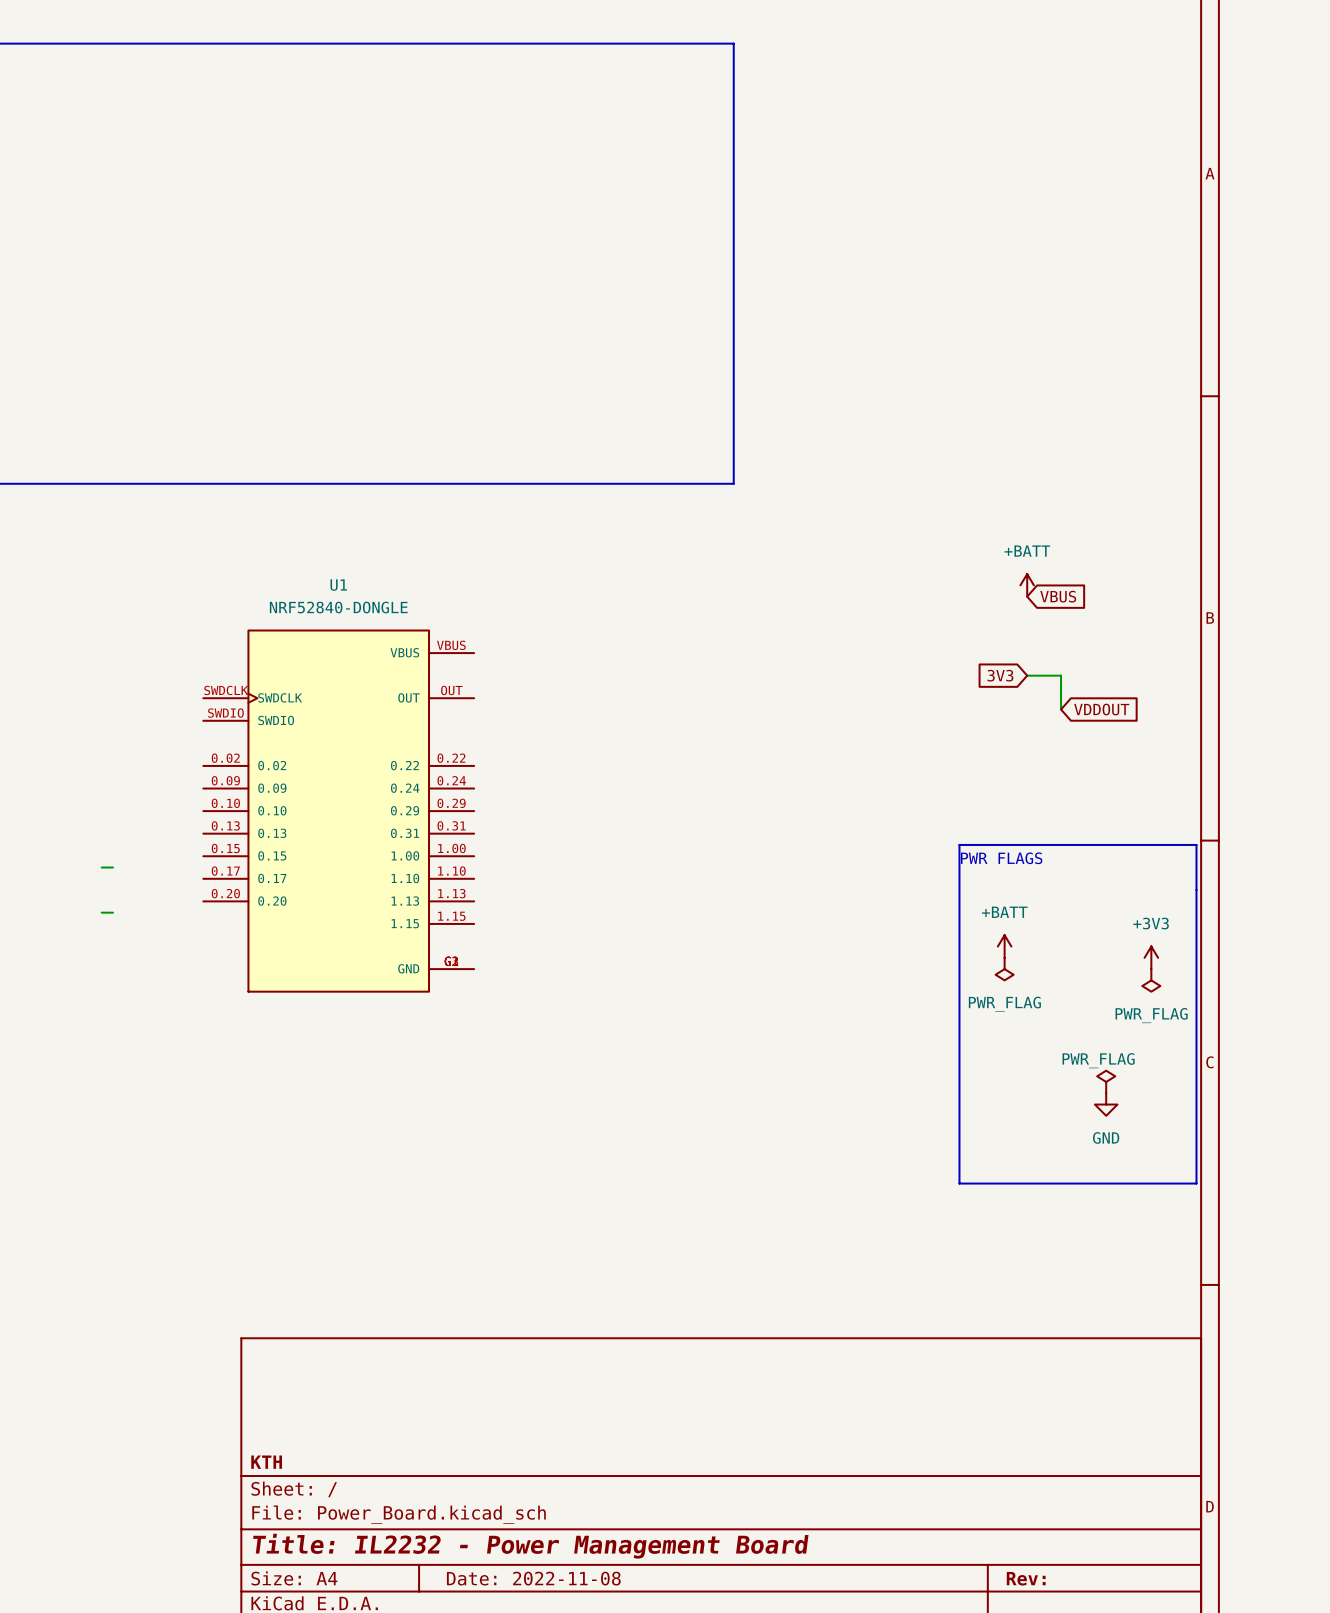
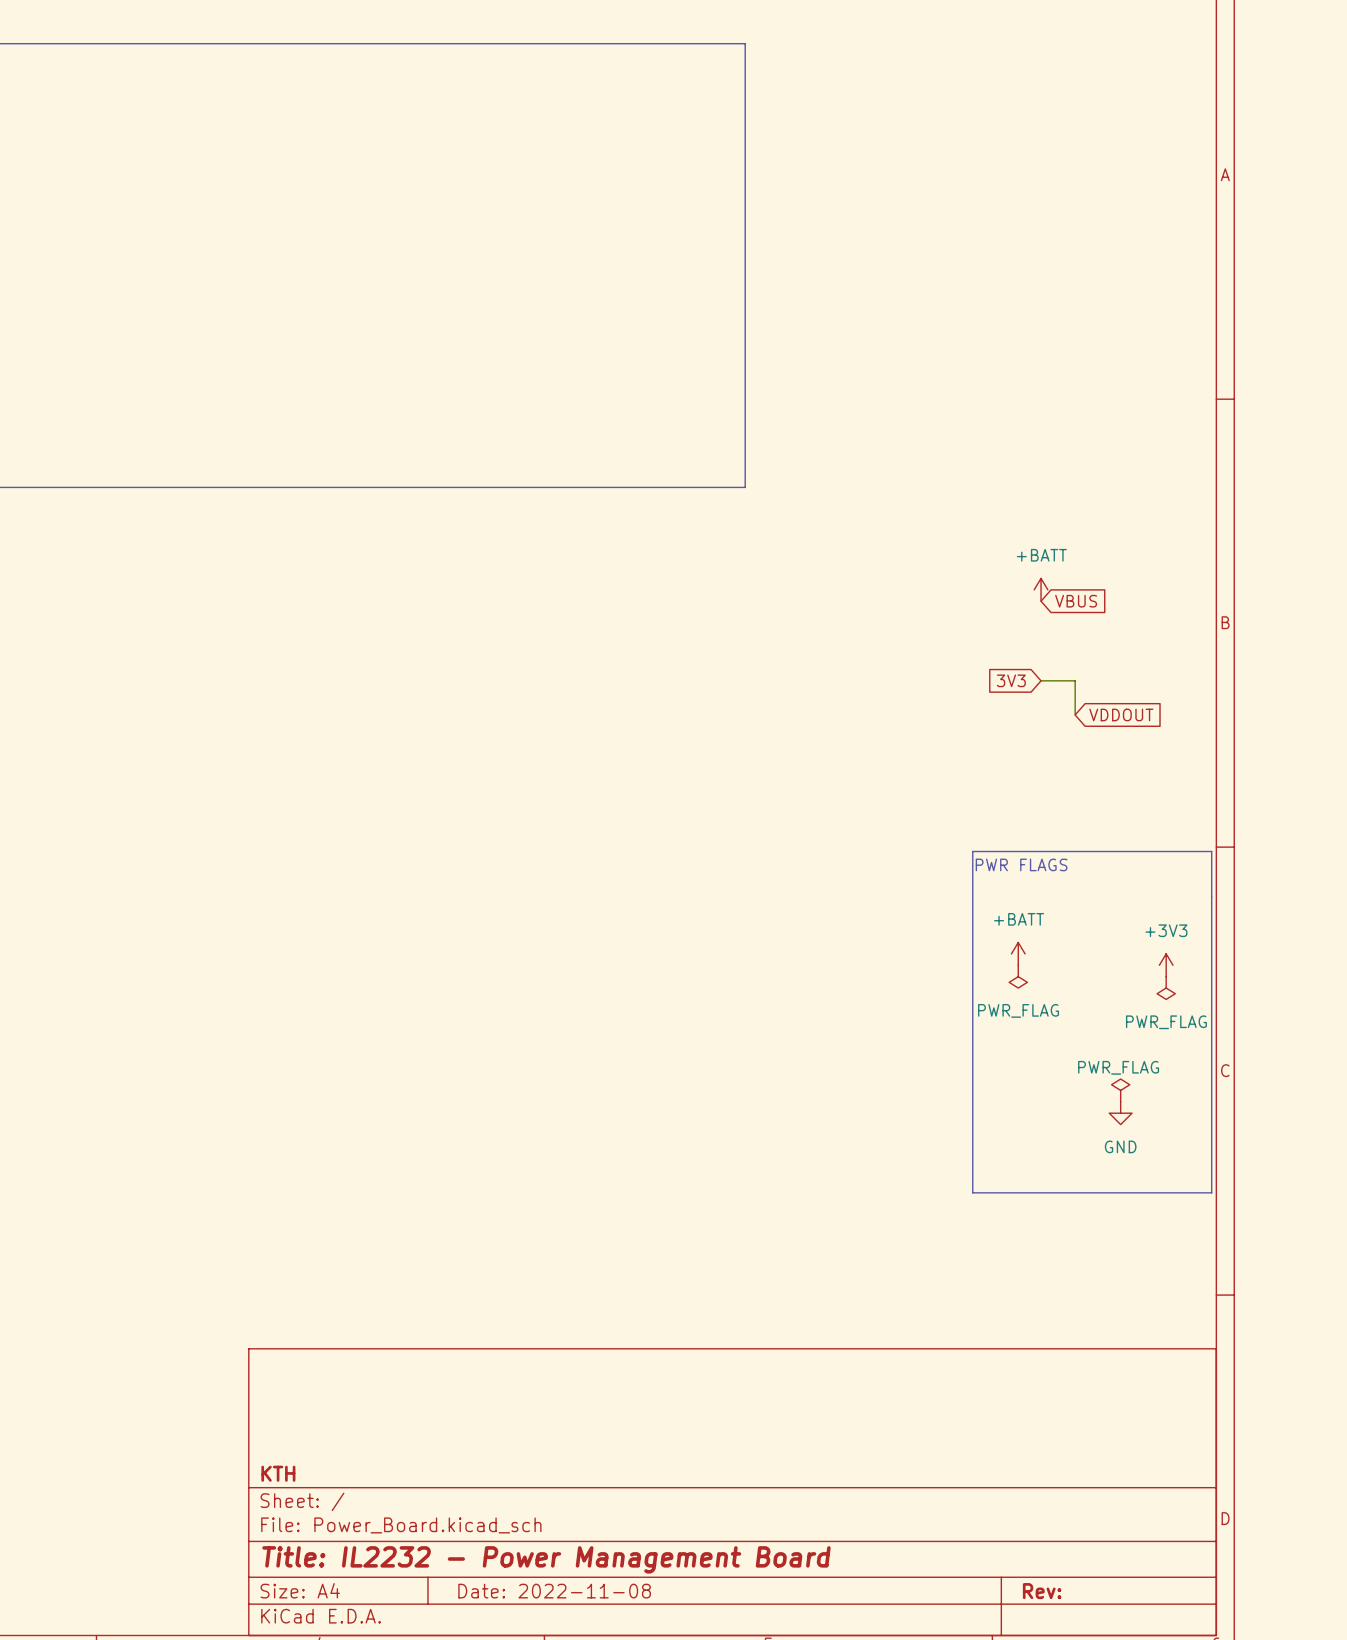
U1: NRF52840-DONGLE (338, 811) -> none
wire: (101, 867) (113, 867) -> none
wire: (101, 912) (113, 912) -> none

